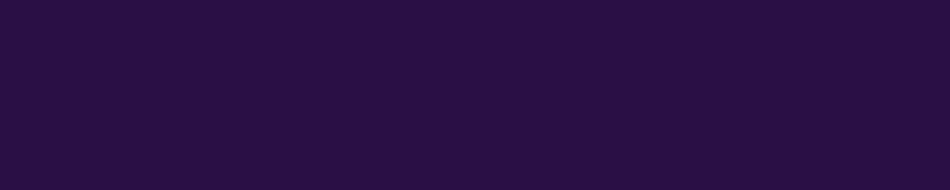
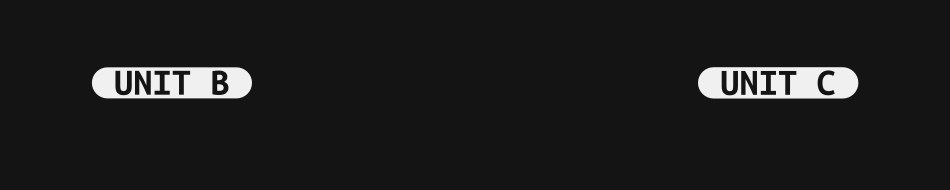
drawing: none -> [91, 67, 253, 99]
drawing: none -> [697, 67, 859, 99]

